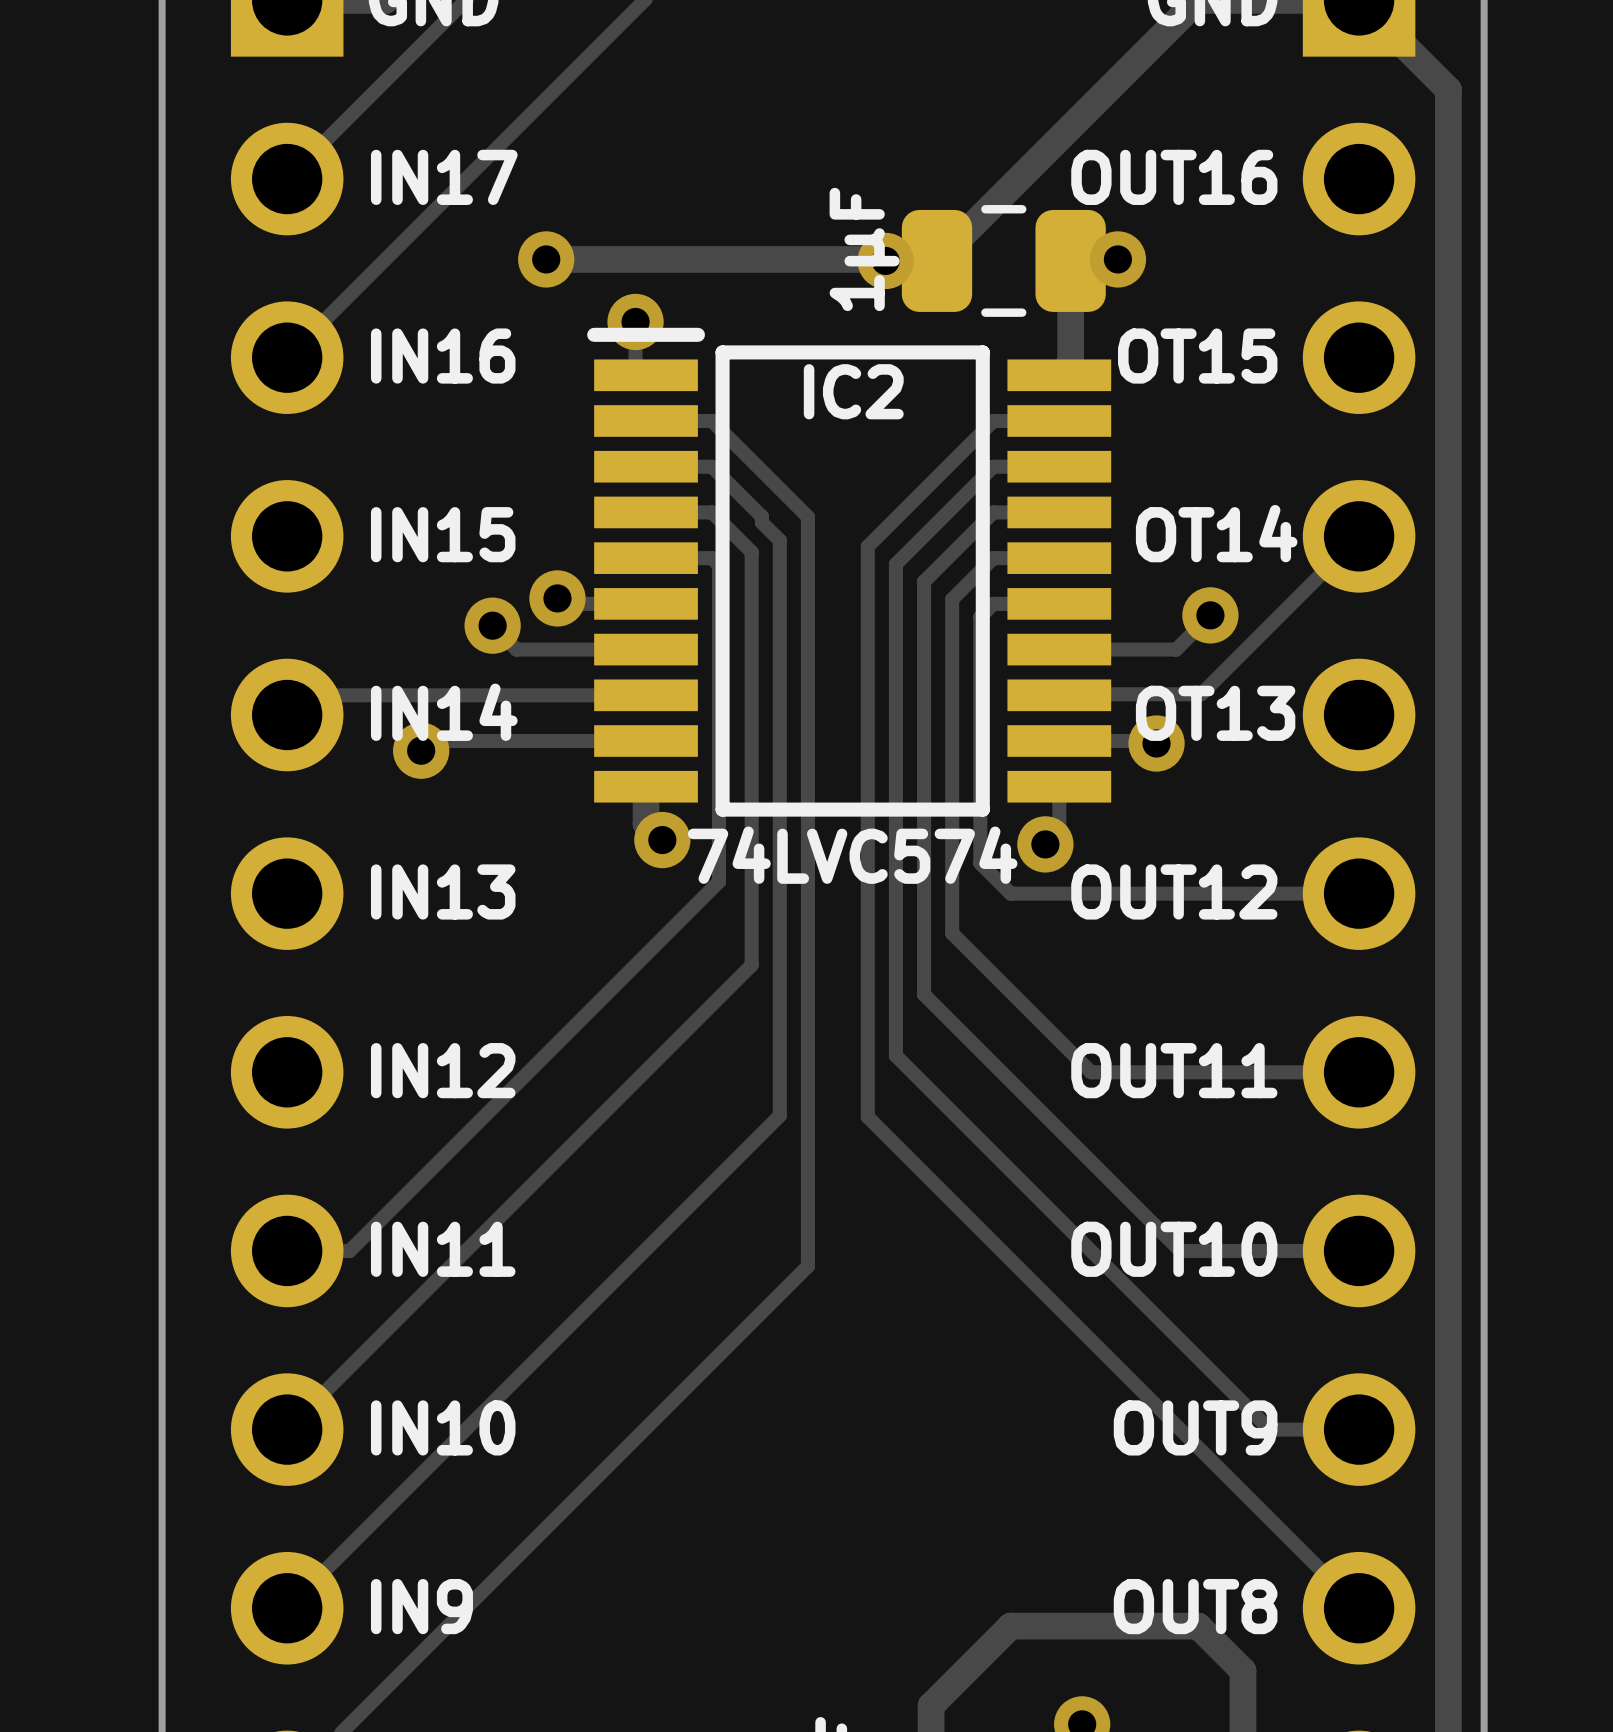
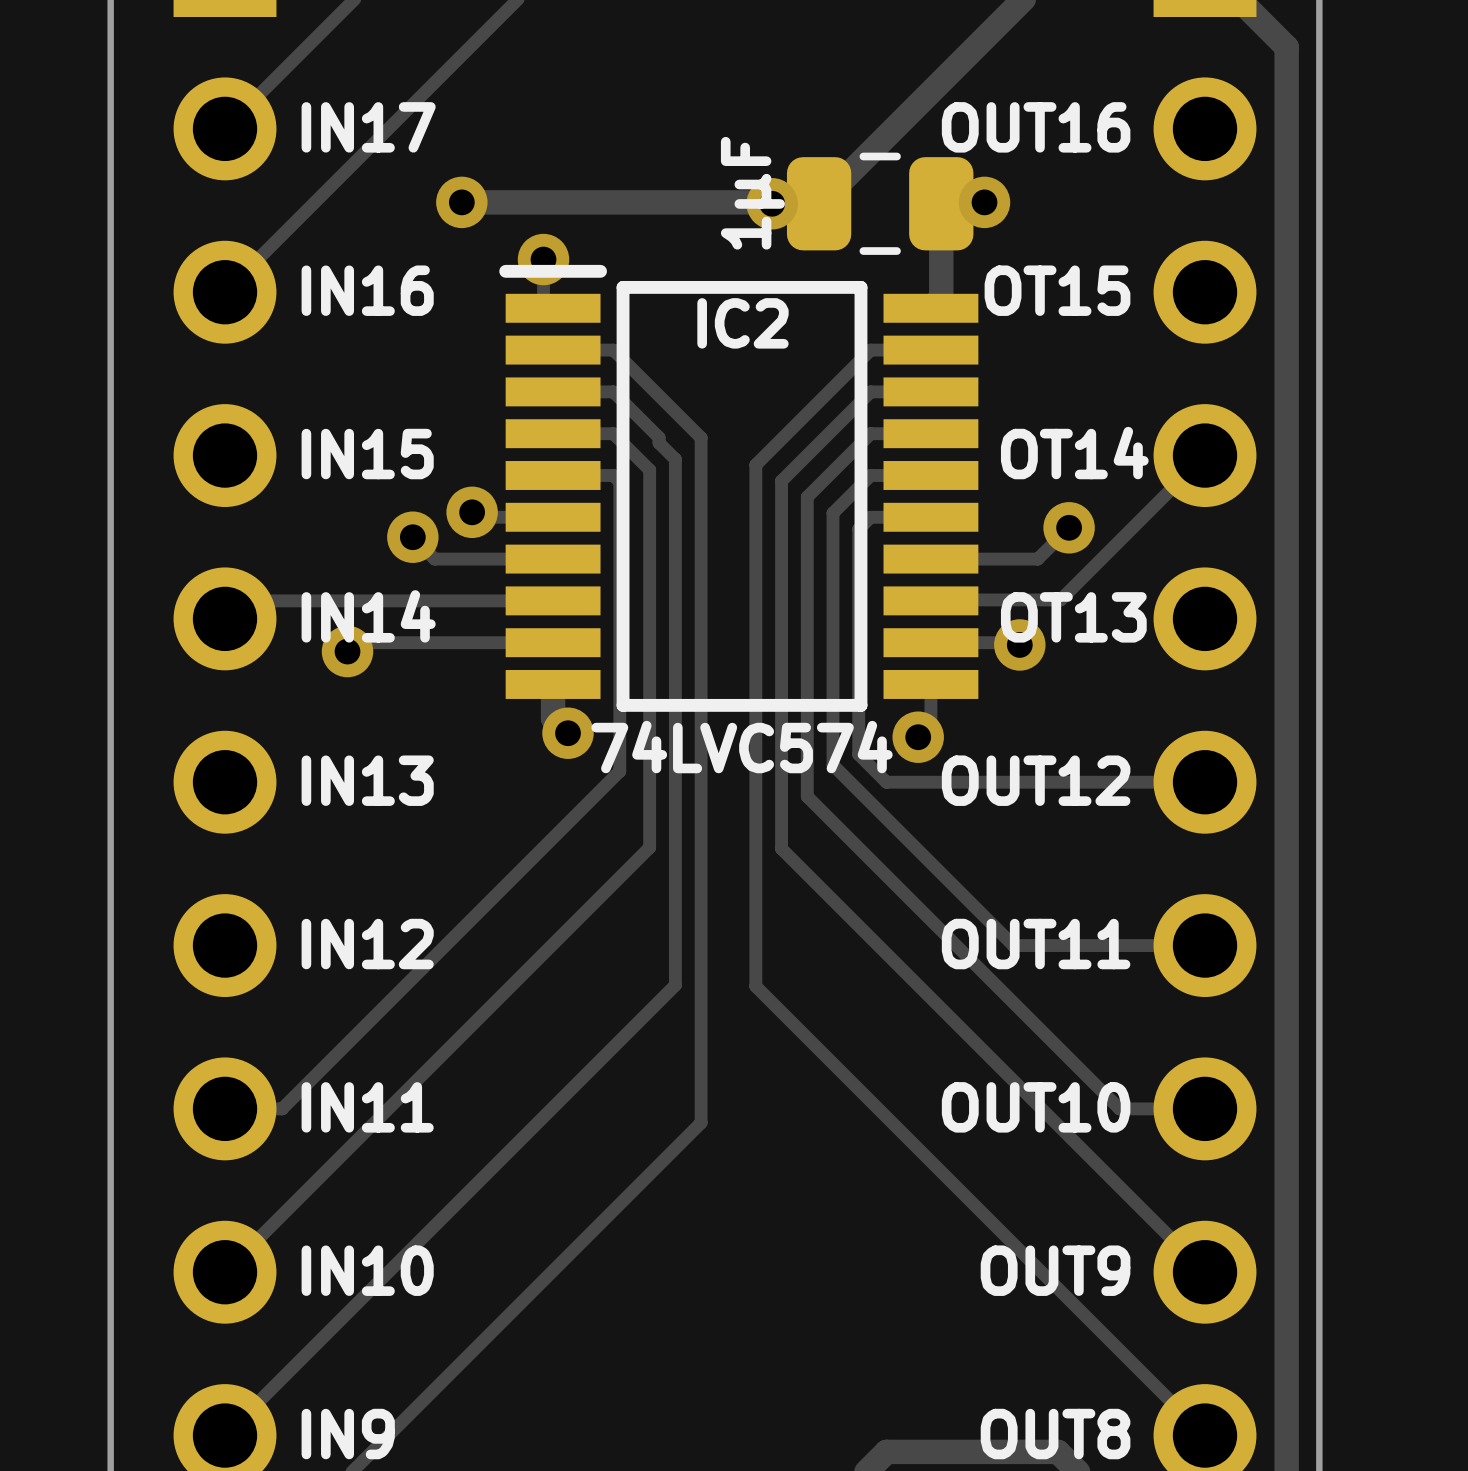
track: (952, 874) (952, 933) (1091, 1072) (1149, 1072) -> (833, 765) (1013, 945)
track: (924, 909) (924, 994) -> (781, 848) (807, 874)
track: none -> (807, 796) (1119, 1108)
track: (895, 966) (895, 1055) (1269, 1429) (1359, 1429) -> none
track: (1180, 1250) (1265, 1250) -> (1041, 1108) (1205, 1272)

